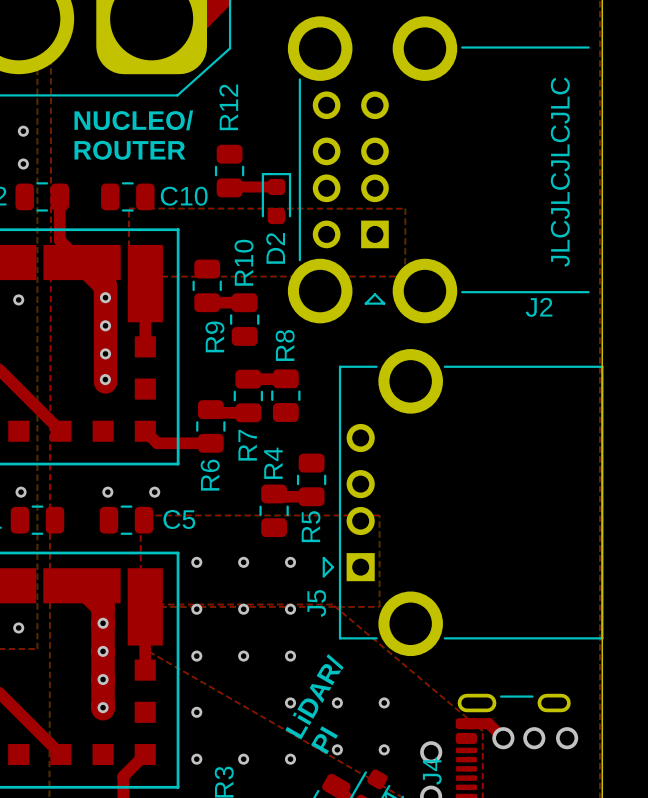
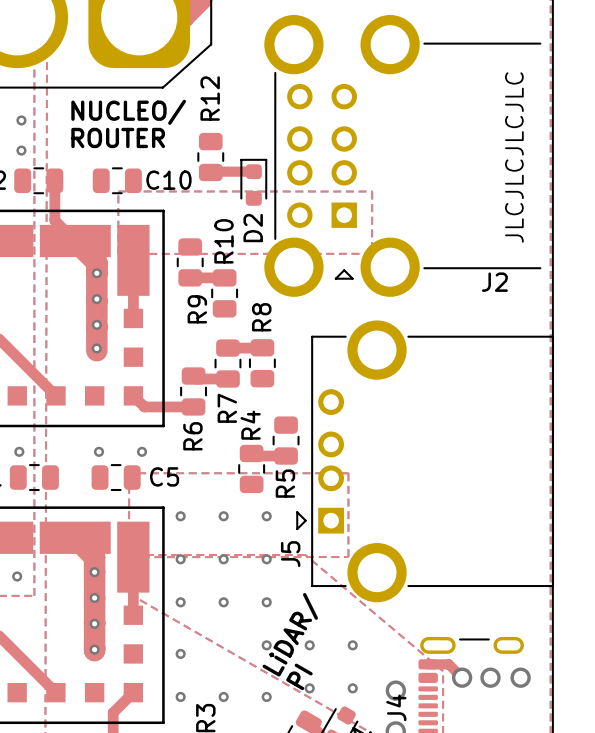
via: (18, 299) -> none

